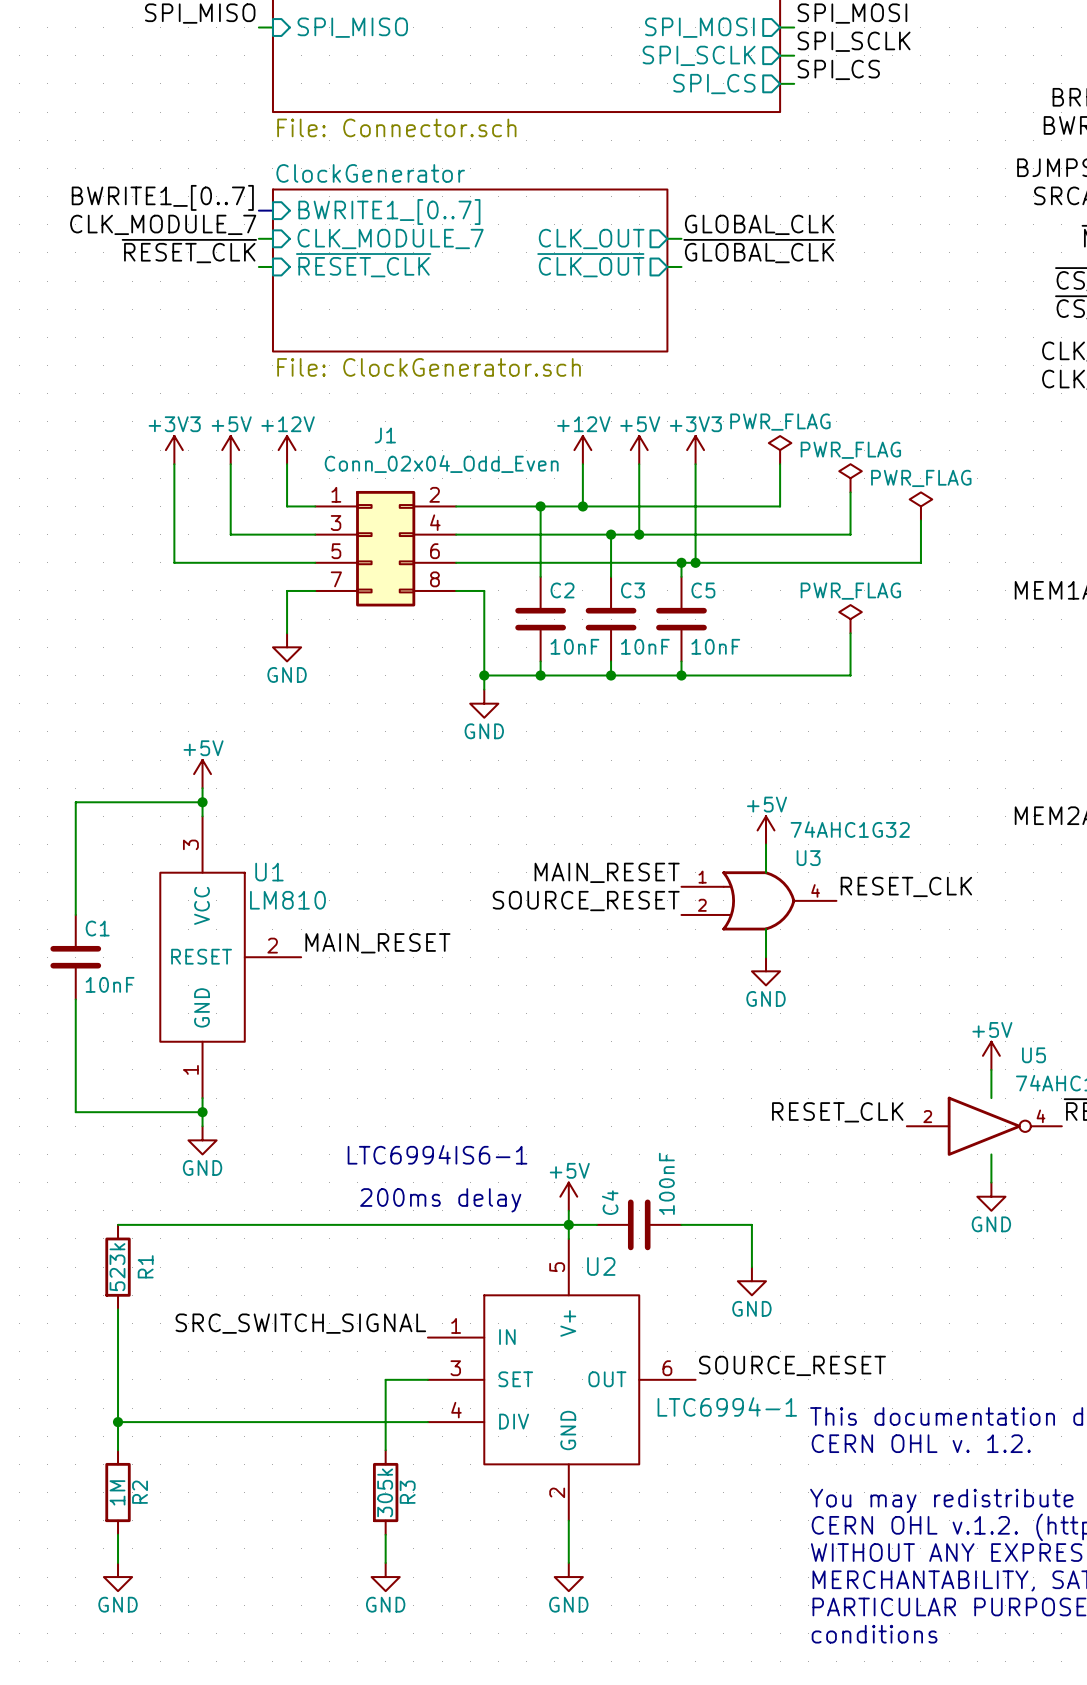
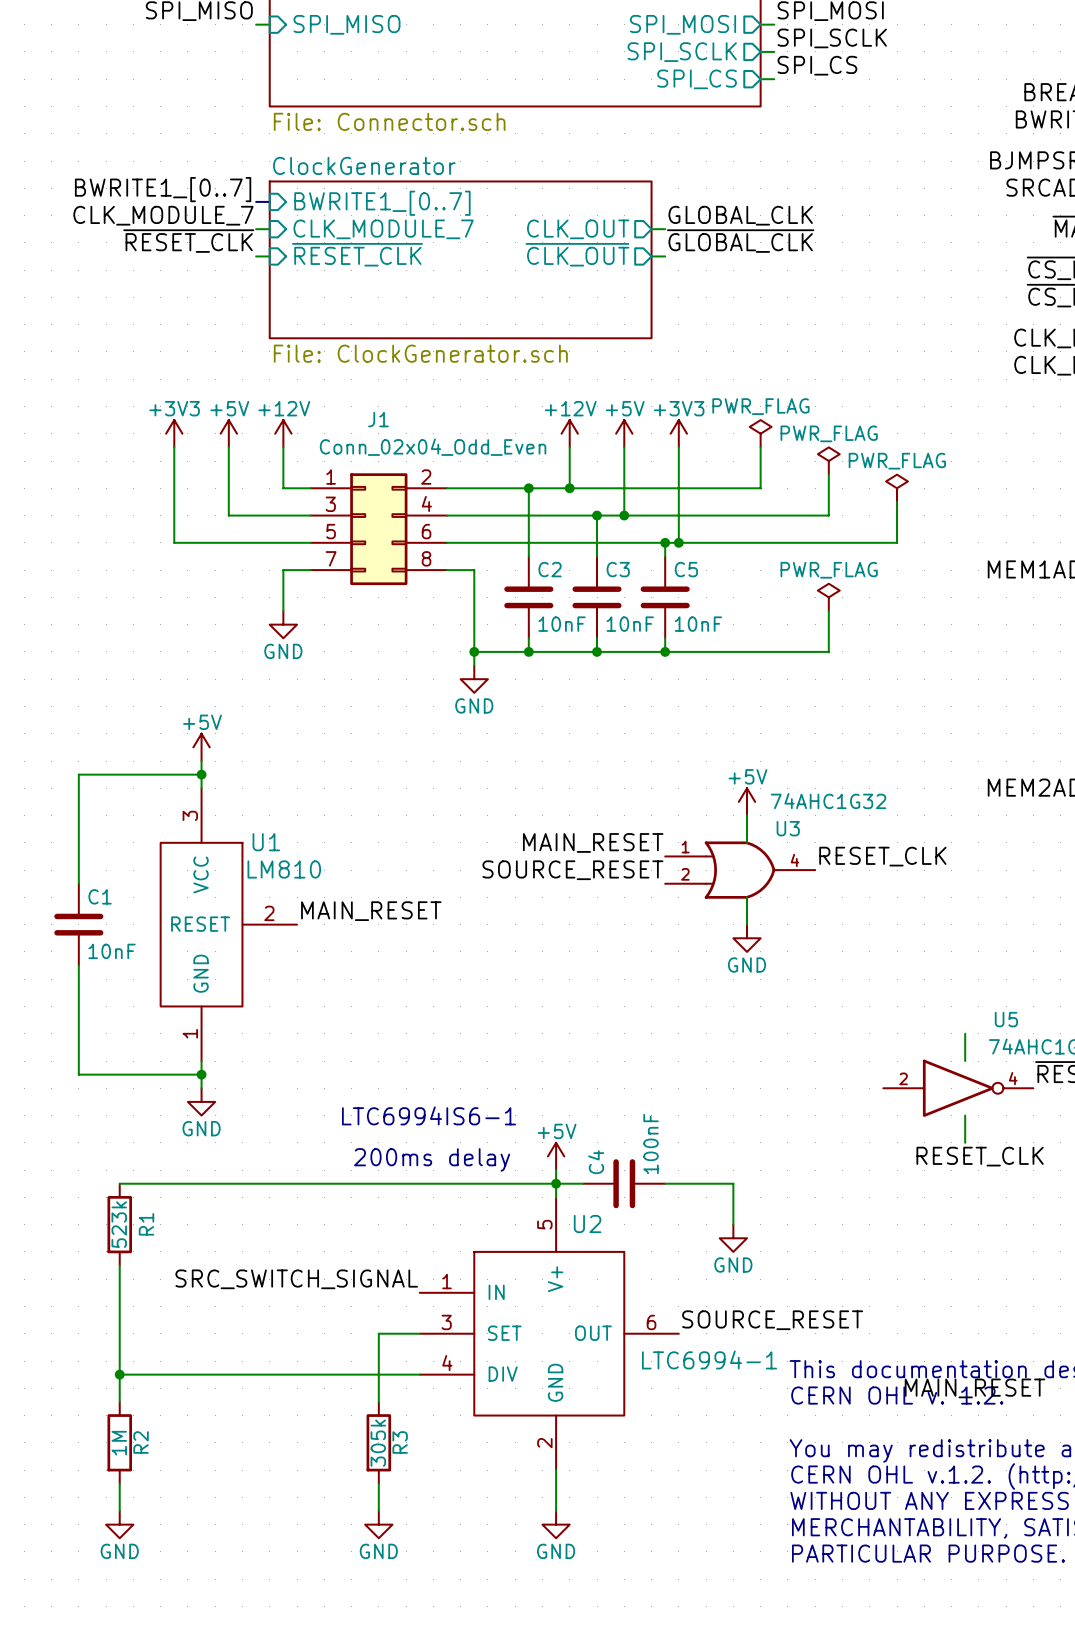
power symbol: +5V (991, 1055) -> none
label position: RESET_CLK (837, 1112) -> RESET_CLK (980, 1156)
power symbol: GND (991, 1196) -> none
label: none -> MAIN_RESET (975, 1388)
text: conditions (874, 1634) -> none

